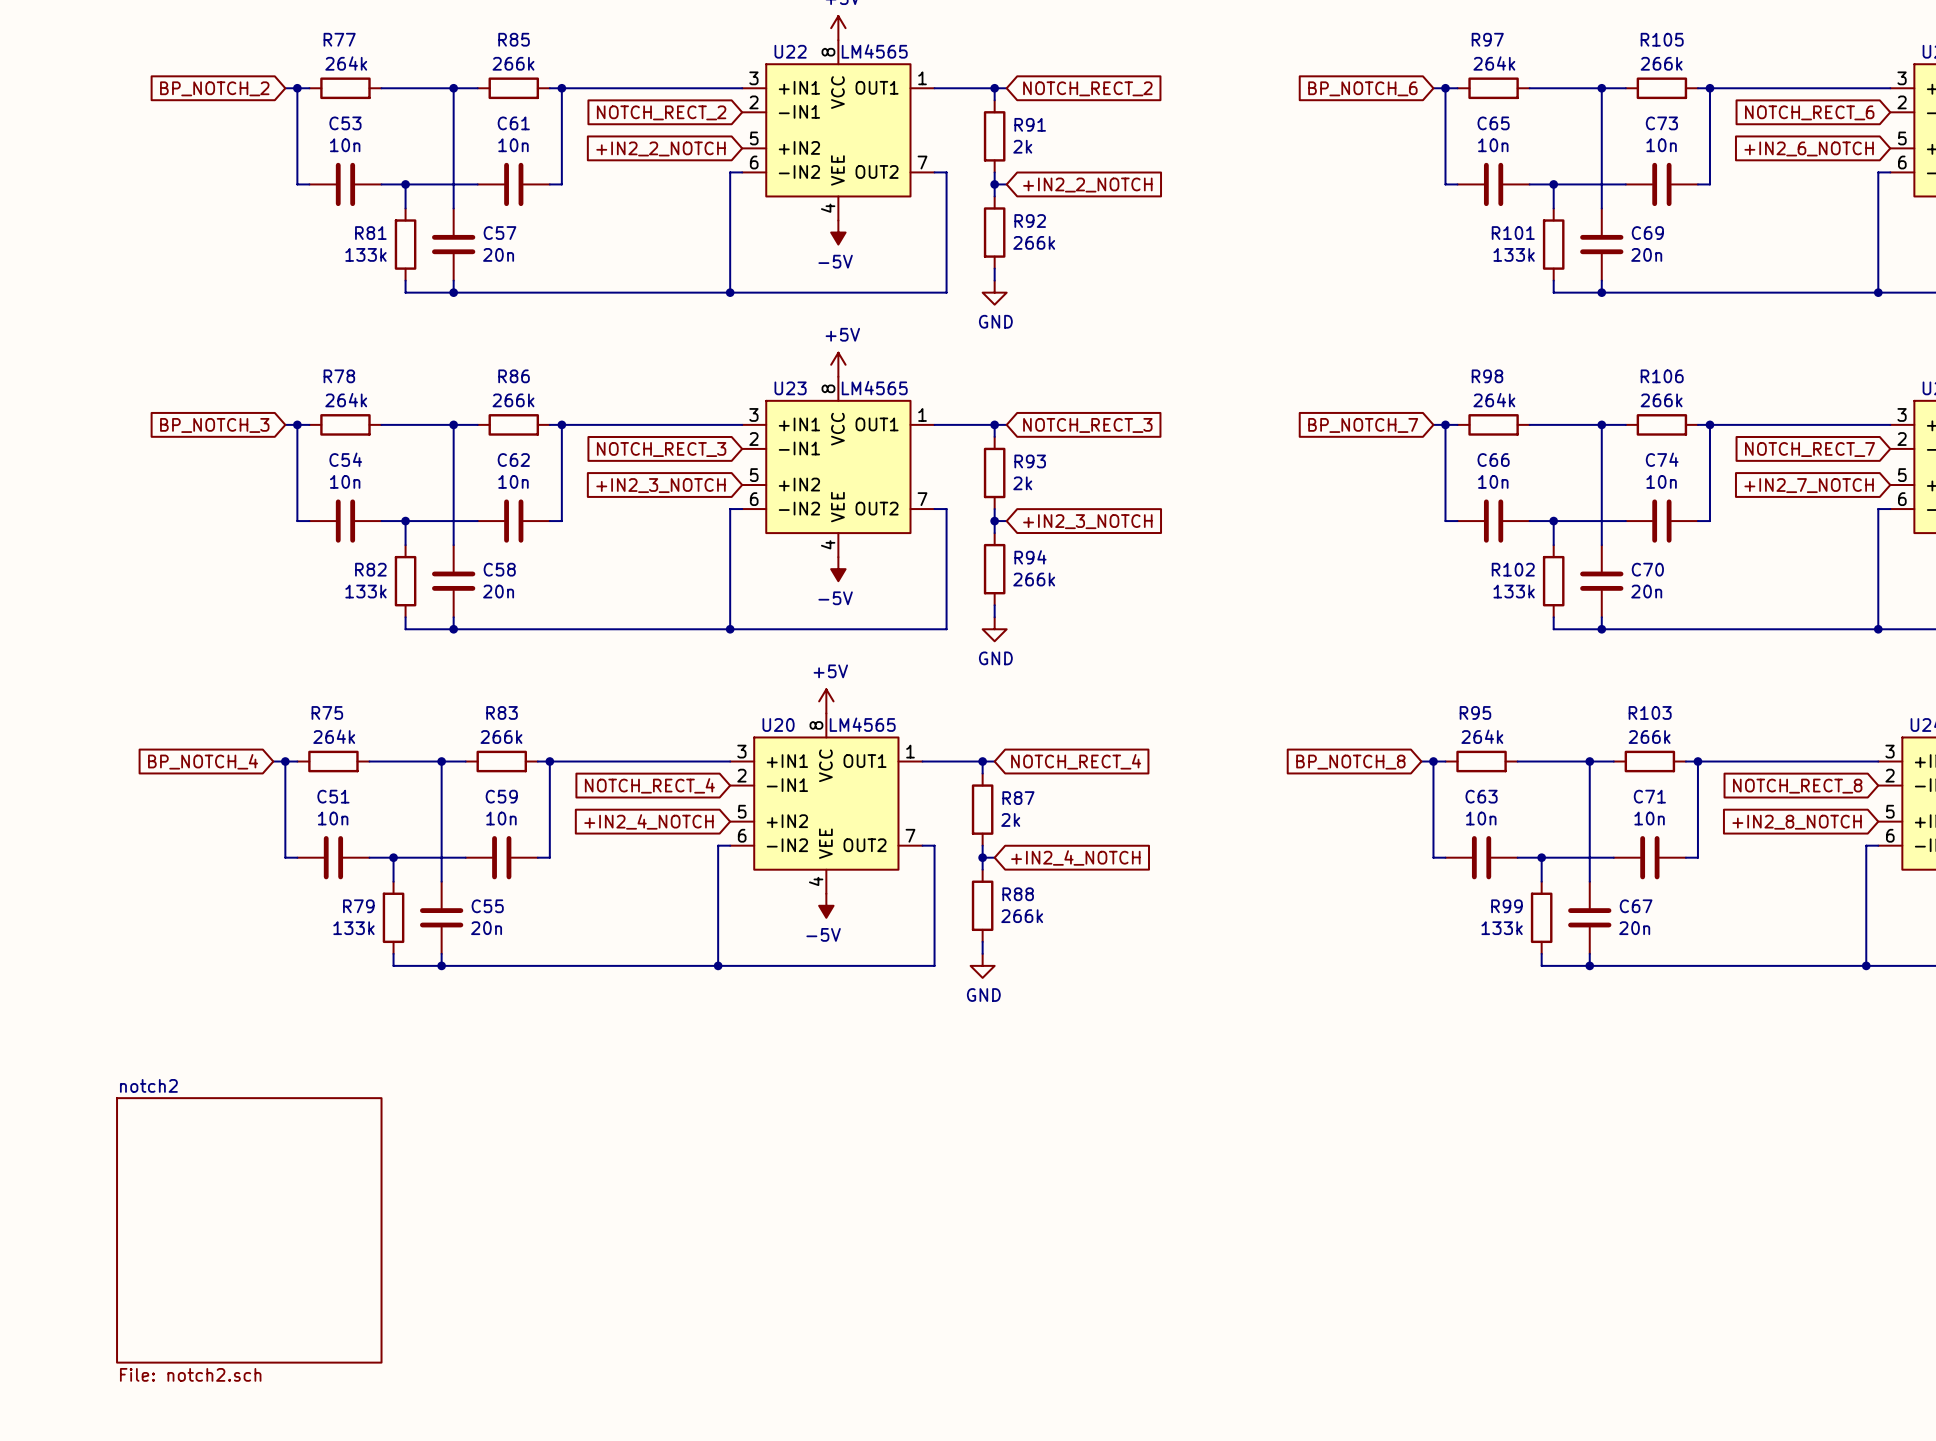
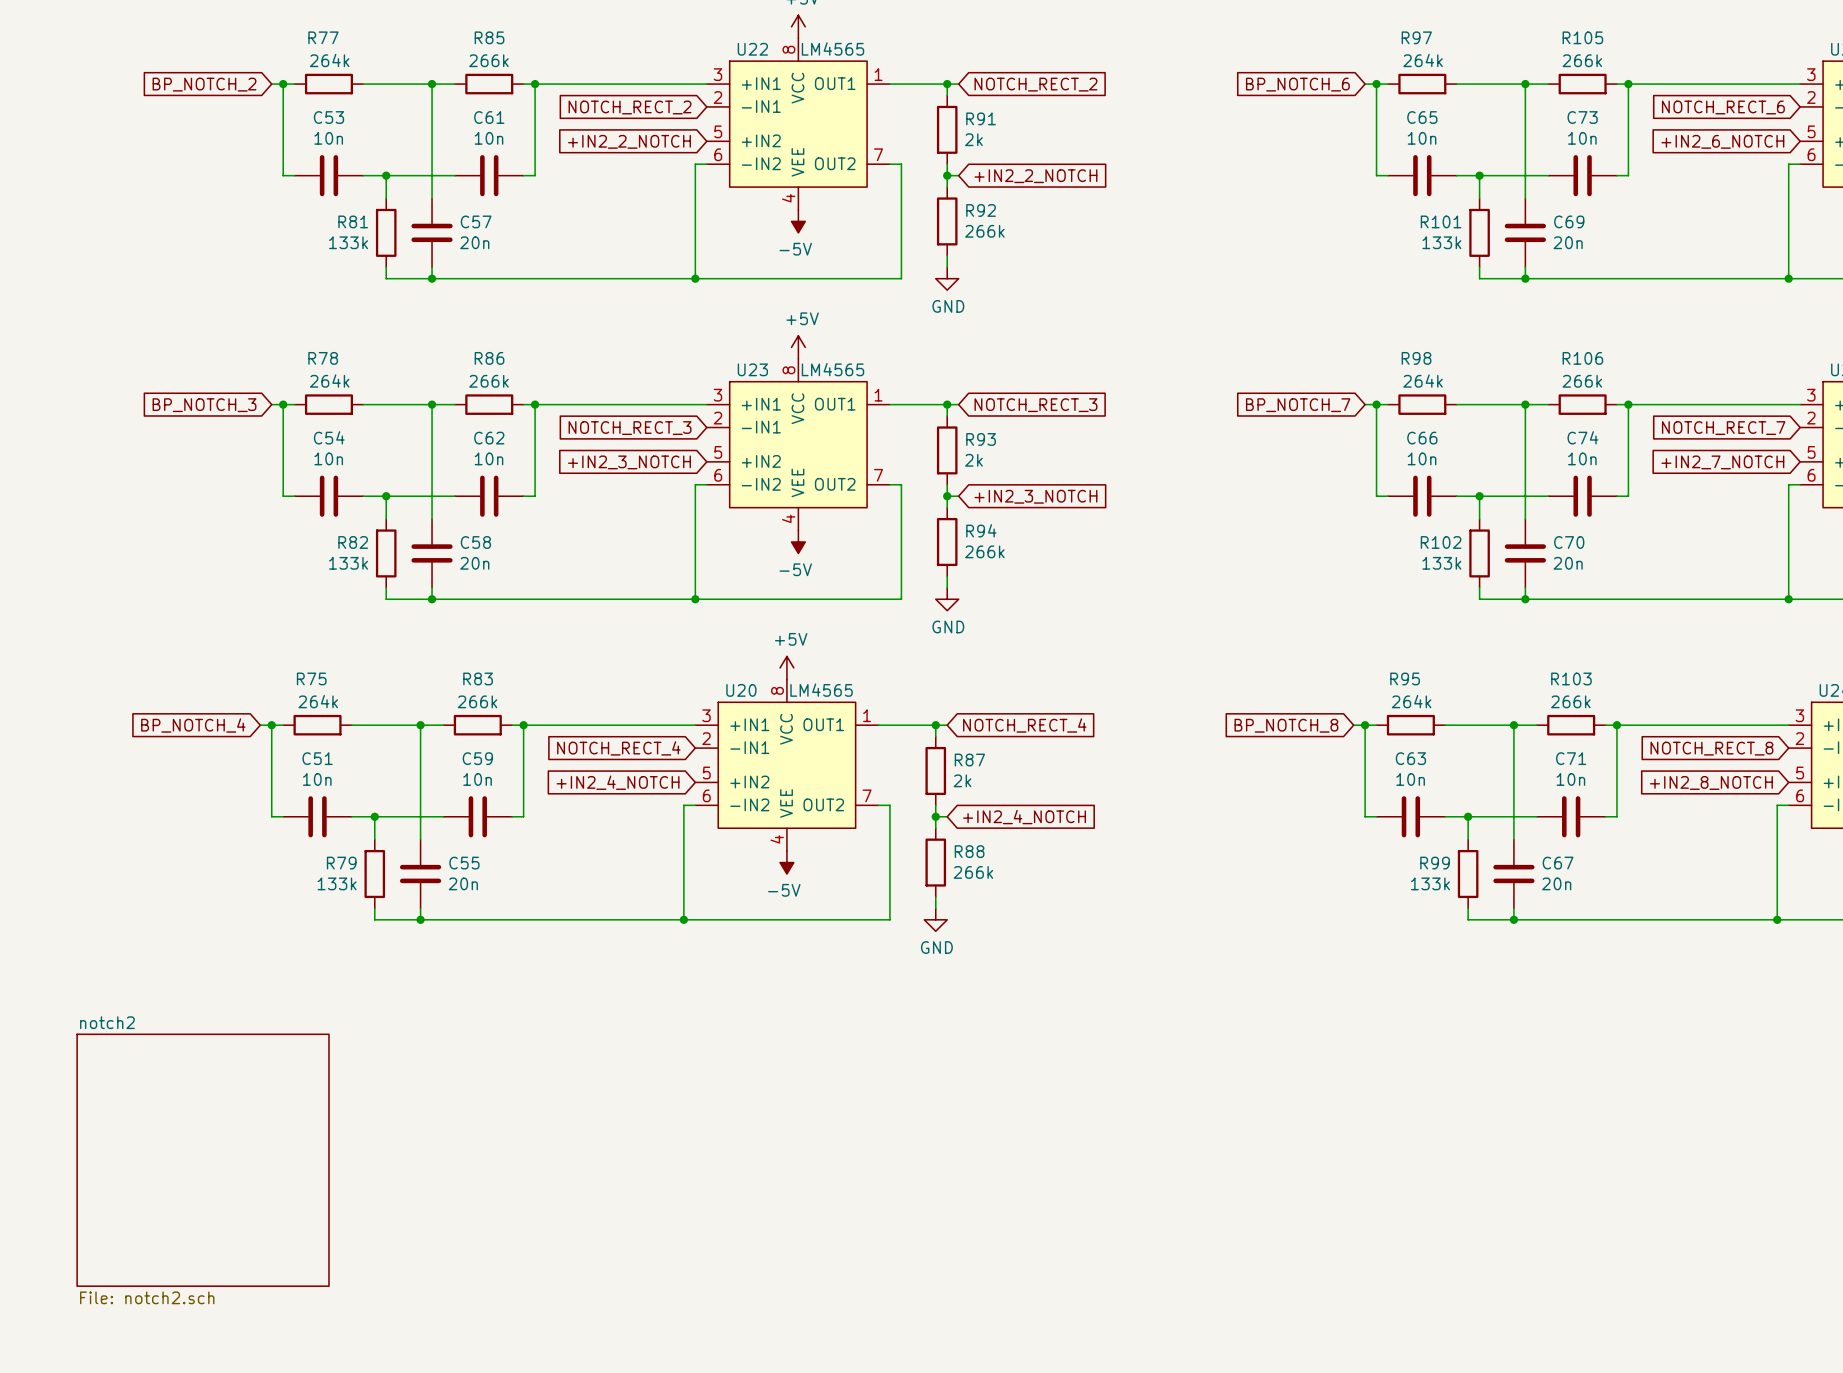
sheet notch2 position: (249, 1230) -> (203, 1160)

